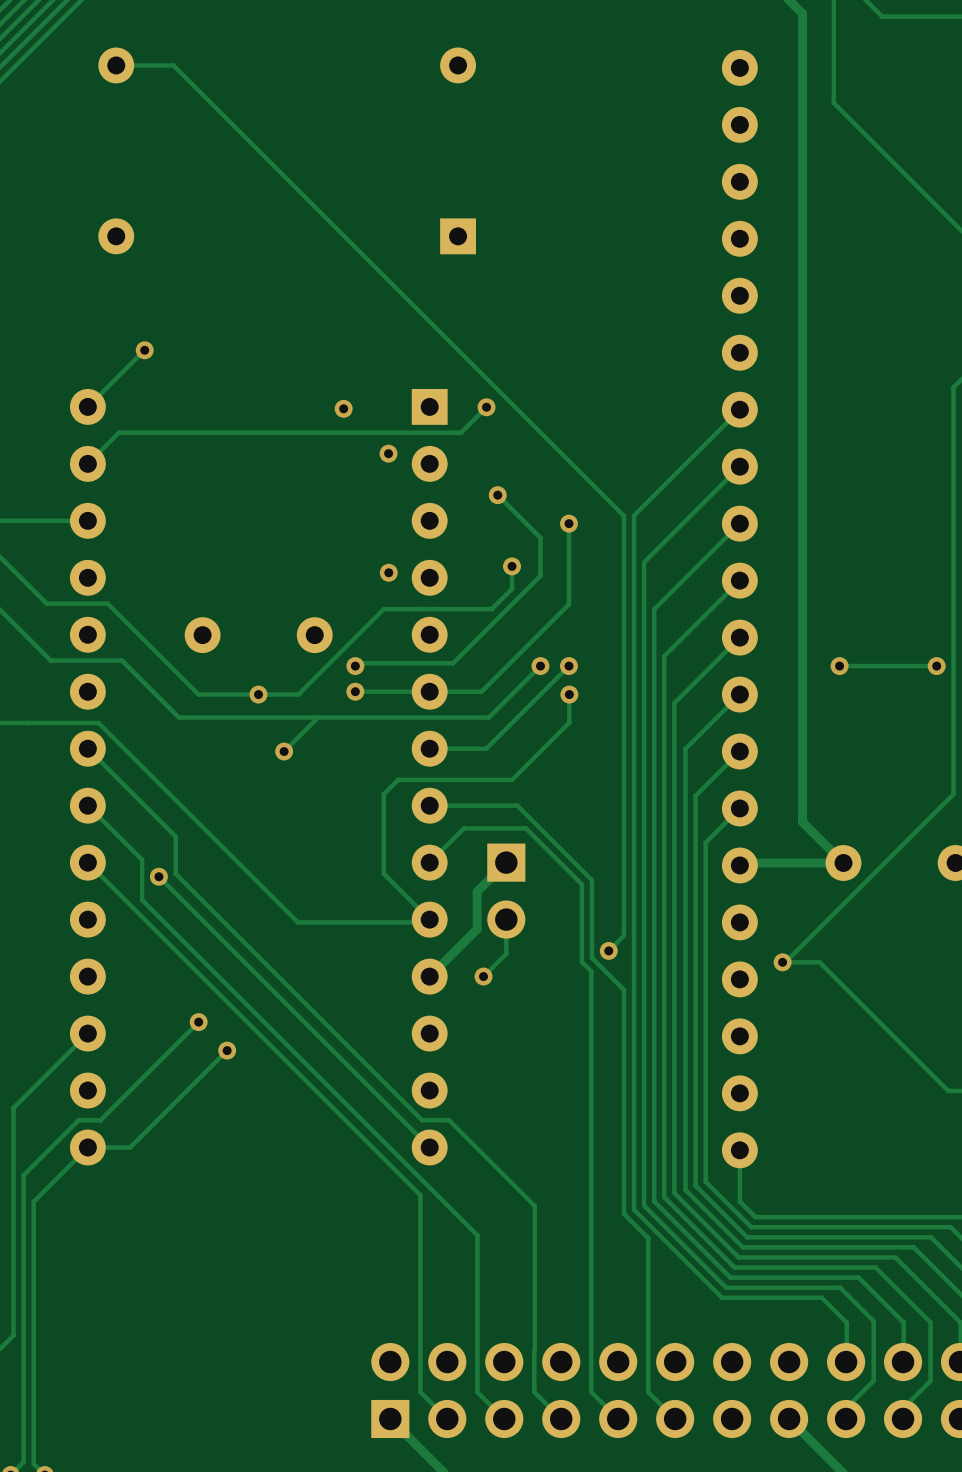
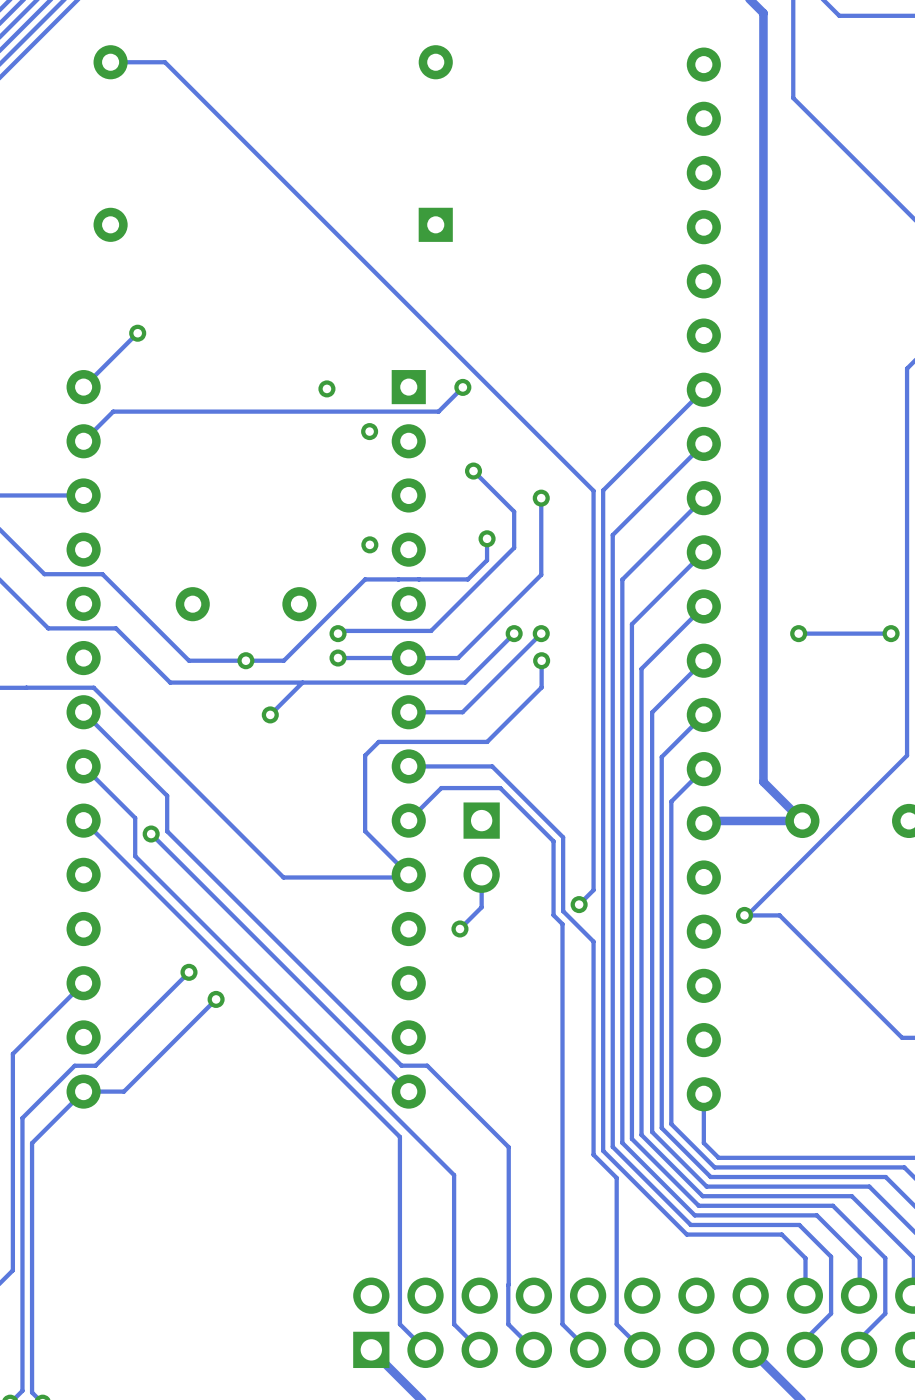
track: (506, 862) (477, 891) (477, 929) (429, 976) -> none

